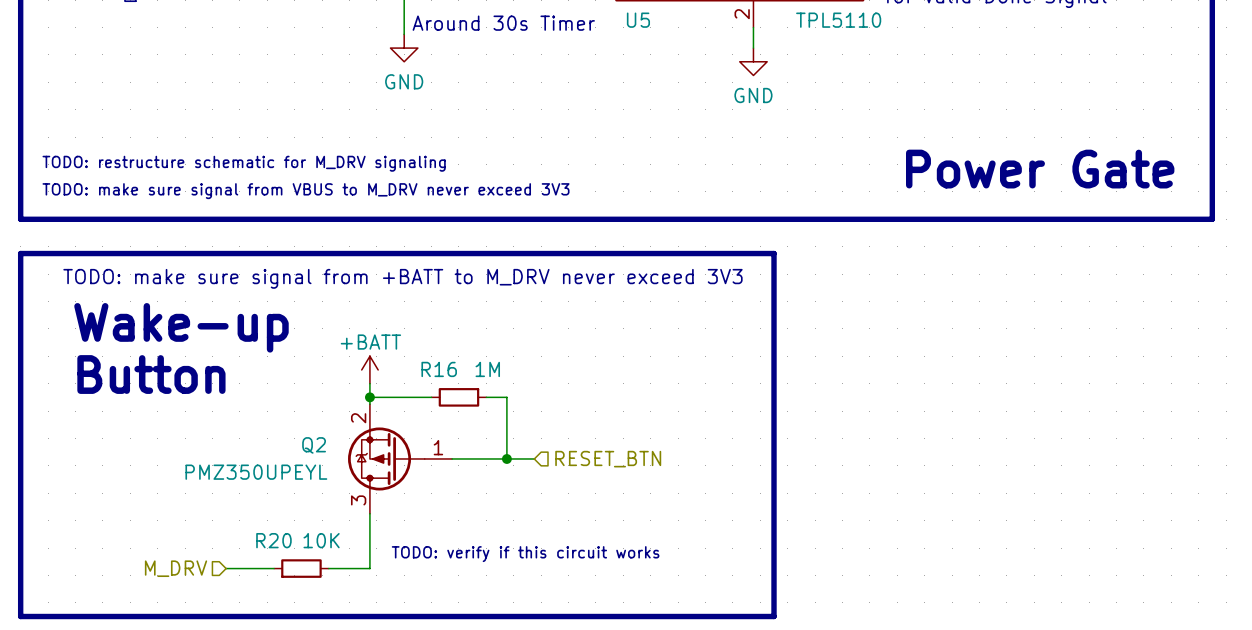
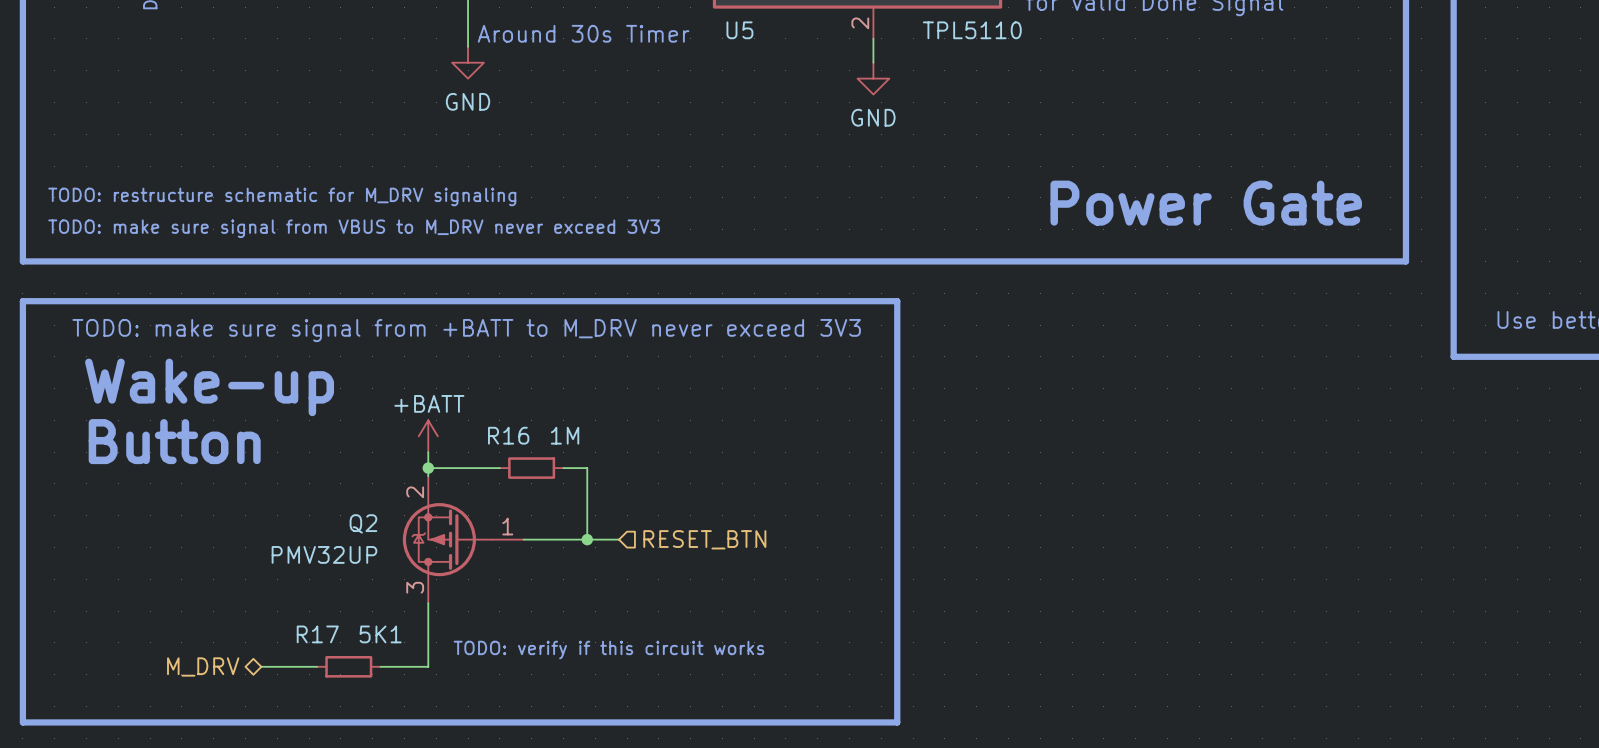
Q2 value: PMZ350UPEYL (256, 472) -> PMV32UP (324, 554)
R20 name: R20 (273, 540) -> R17 (317, 634)
R20 value: 10K (321, 540) -> 5K1 (380, 634)
hierarchical label shape: input (176, 568) -> bidirectional (203, 666)

